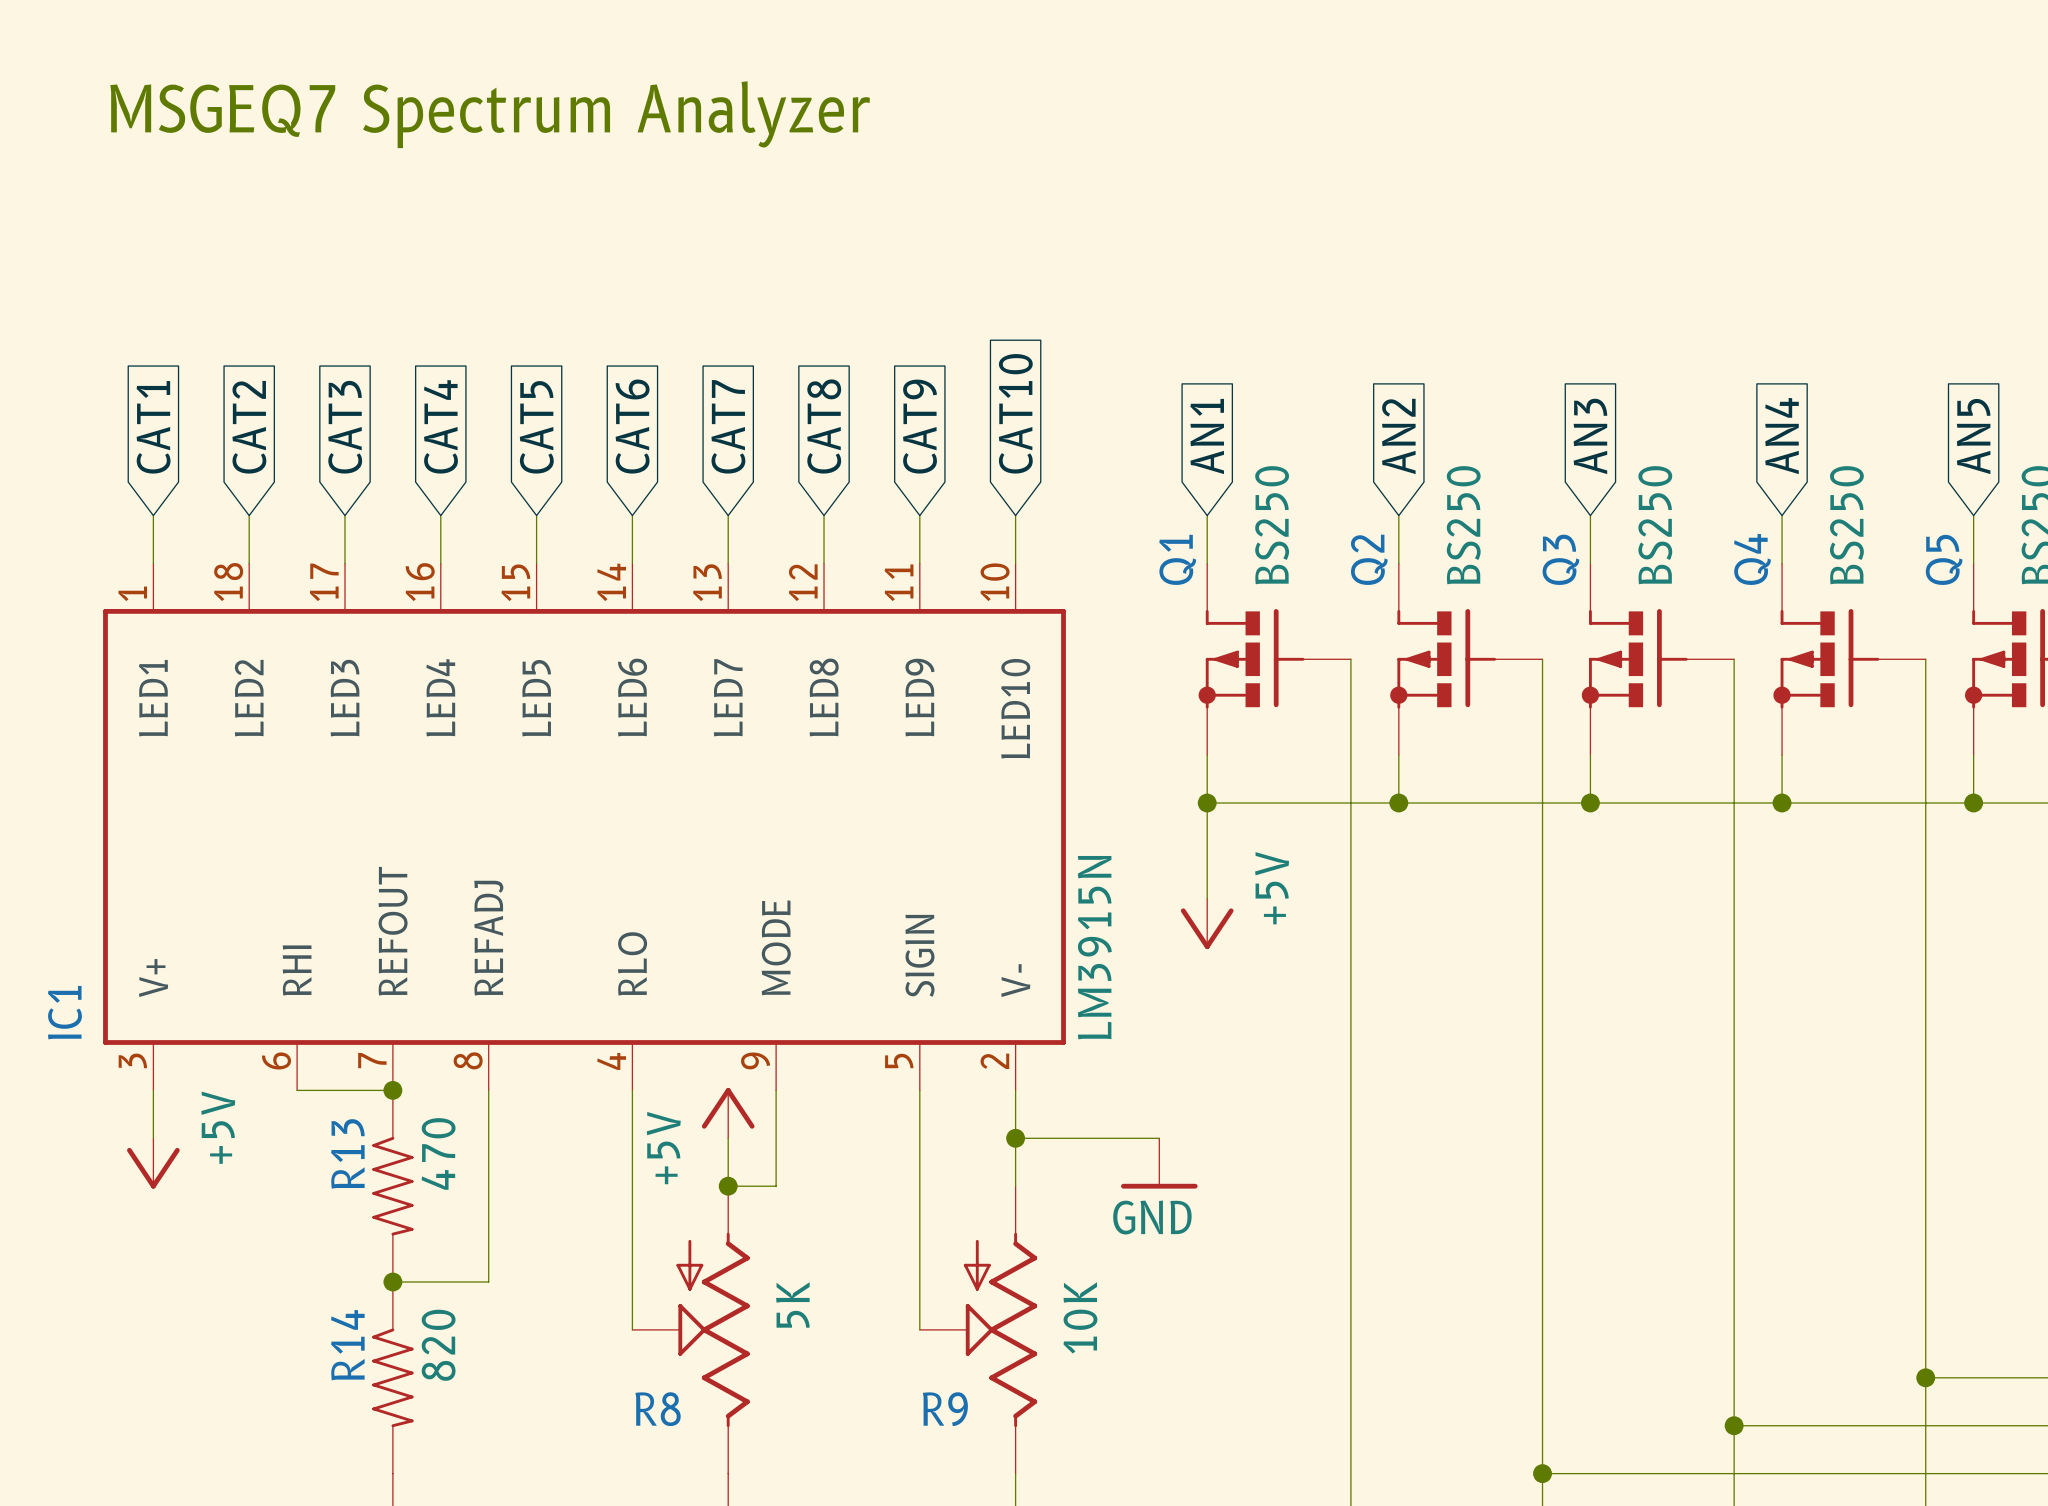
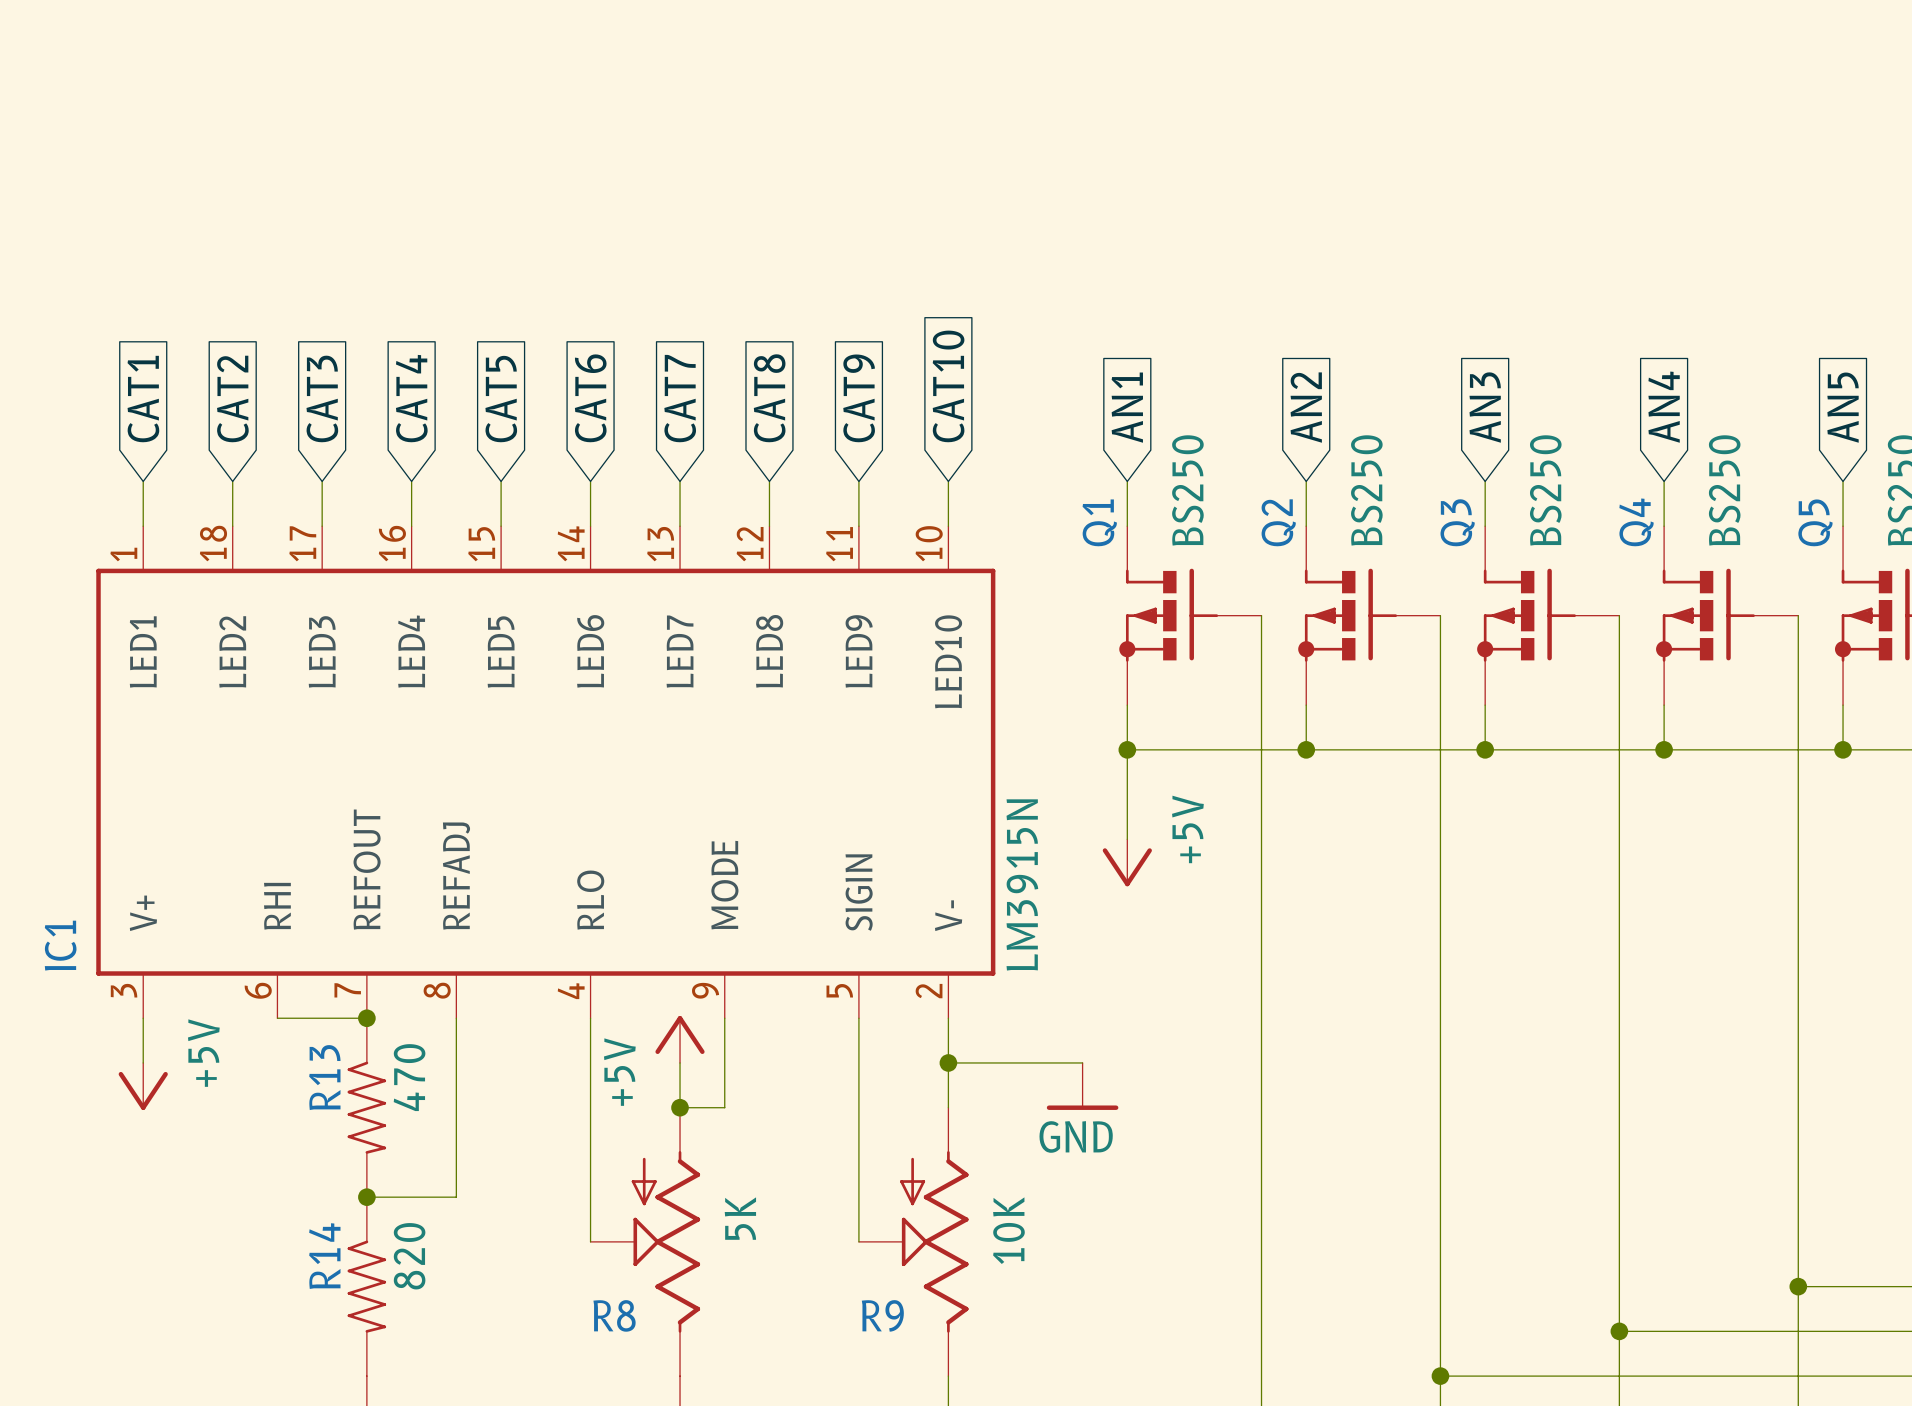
text: MSGEQ7 Spectrum Analyzer (490, 114) -> none

